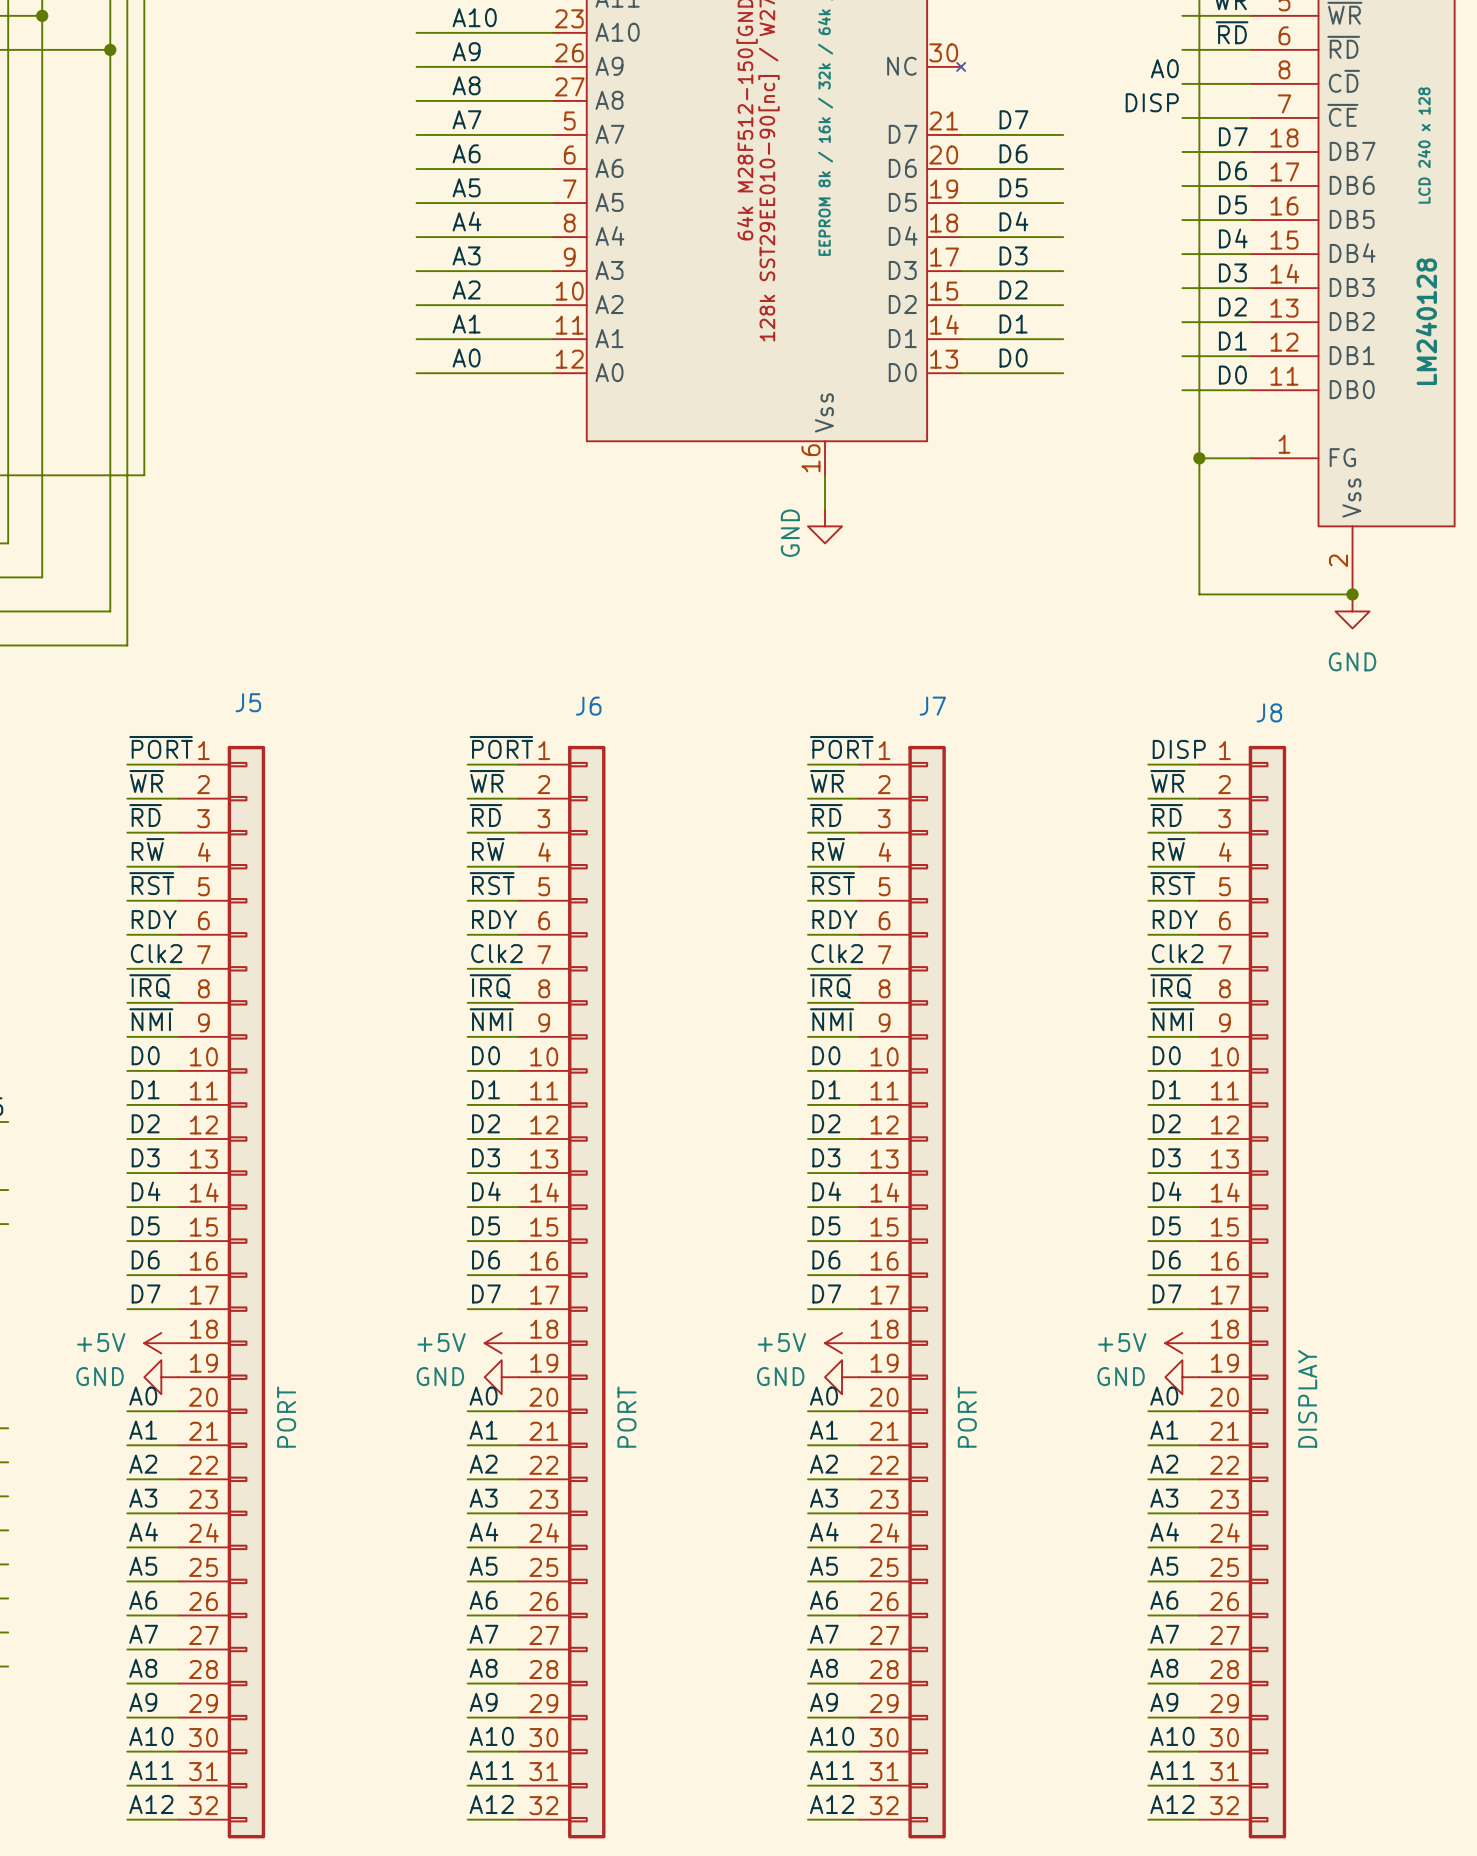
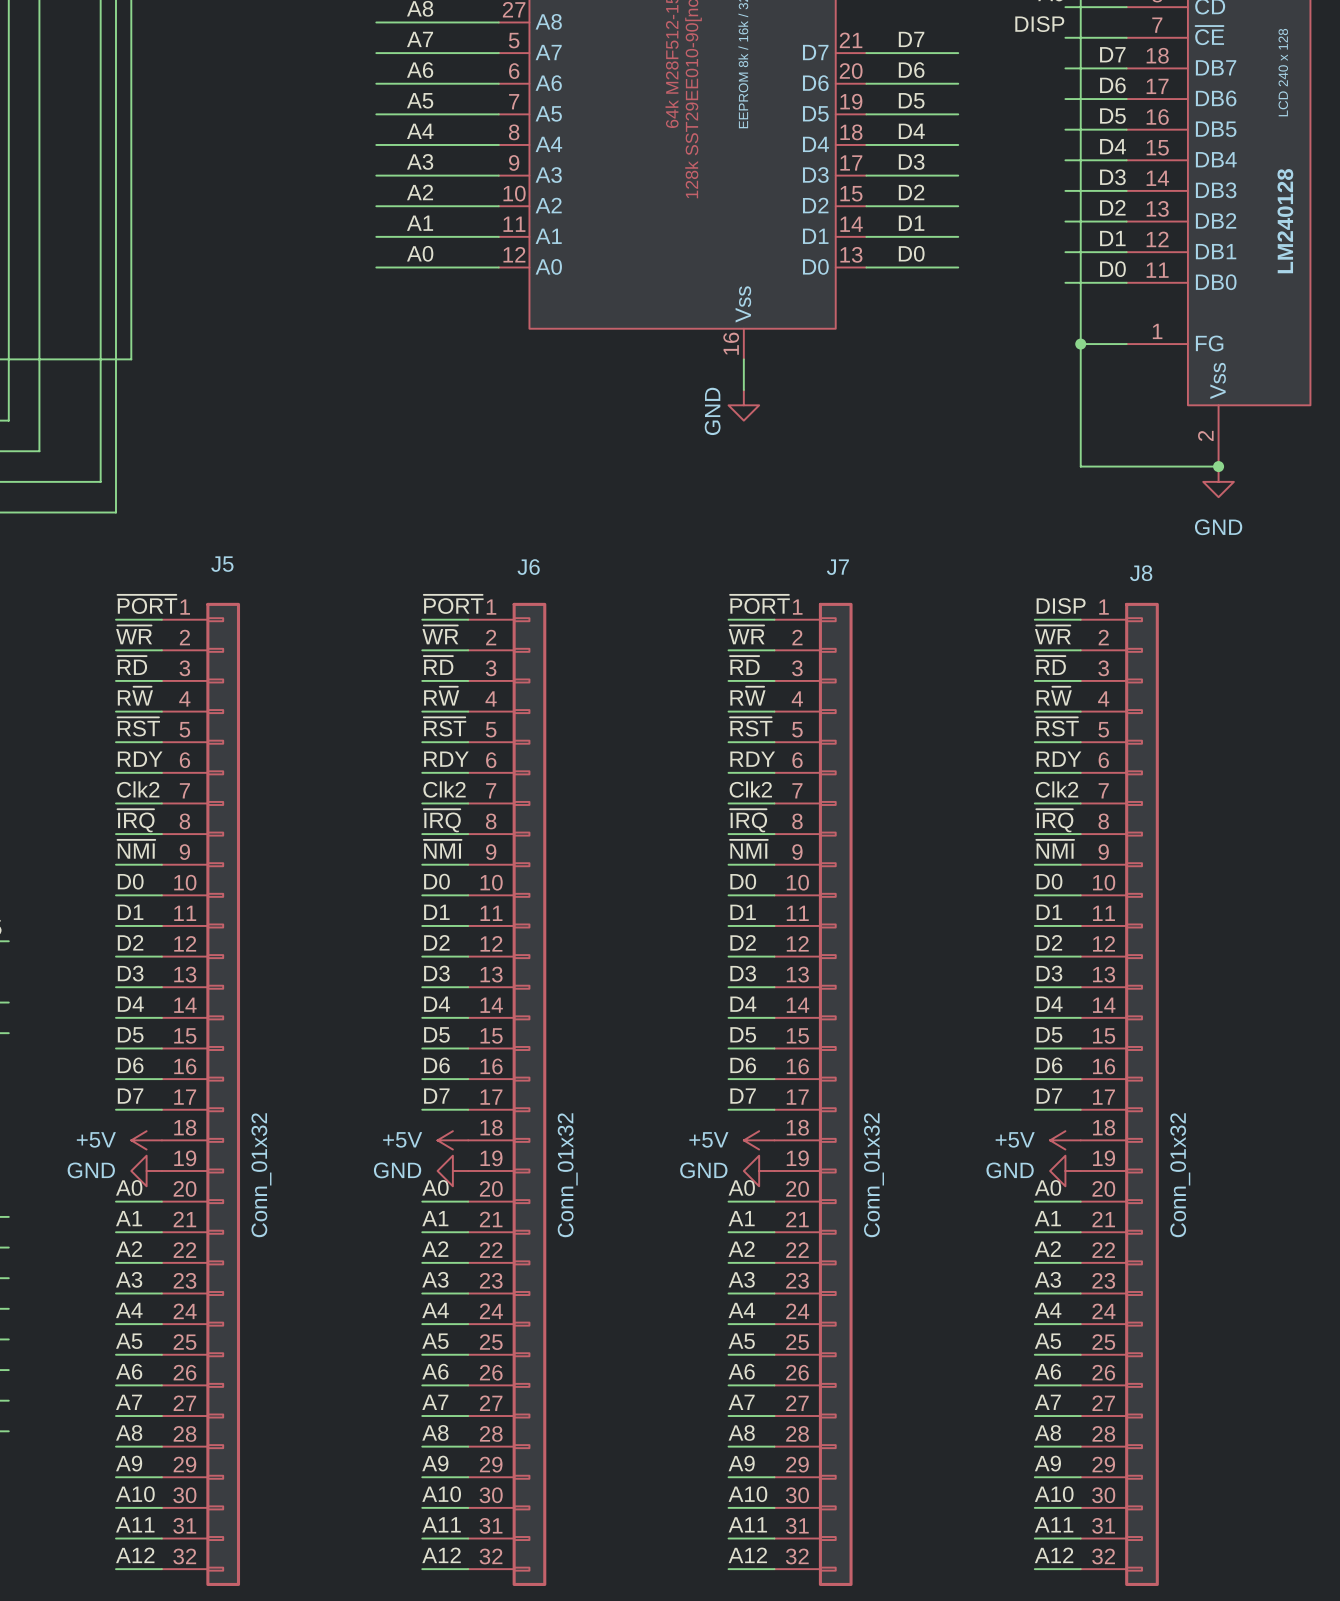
J8 value: DISPLAY (1307, 1398) -> Conn_01x32 (1180, 1175)
J5 value: PORT (286, 1417) -> Conn_01x32 (261, 1175)
J6 value: PORT (626, 1417) -> Conn_01x32 (567, 1175)
J7 value: PORT (967, 1417) -> Conn_01x32 (874, 1175)

